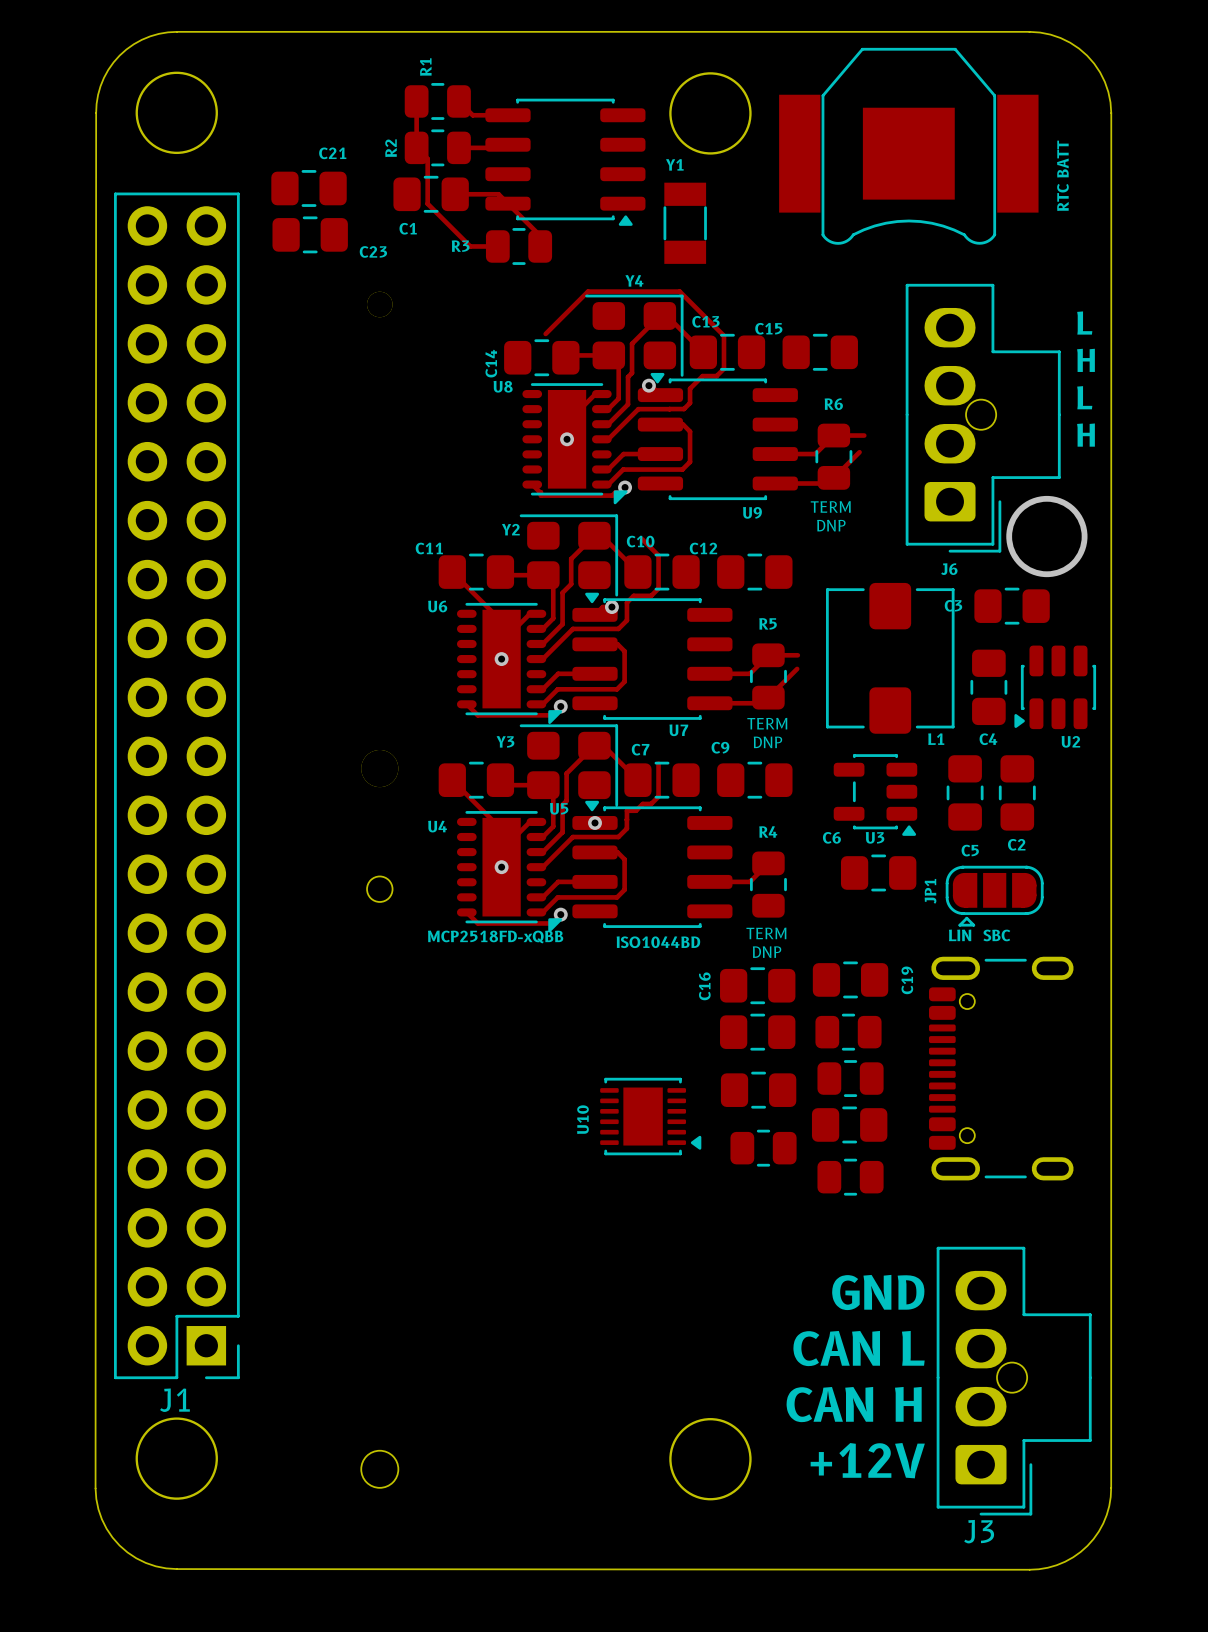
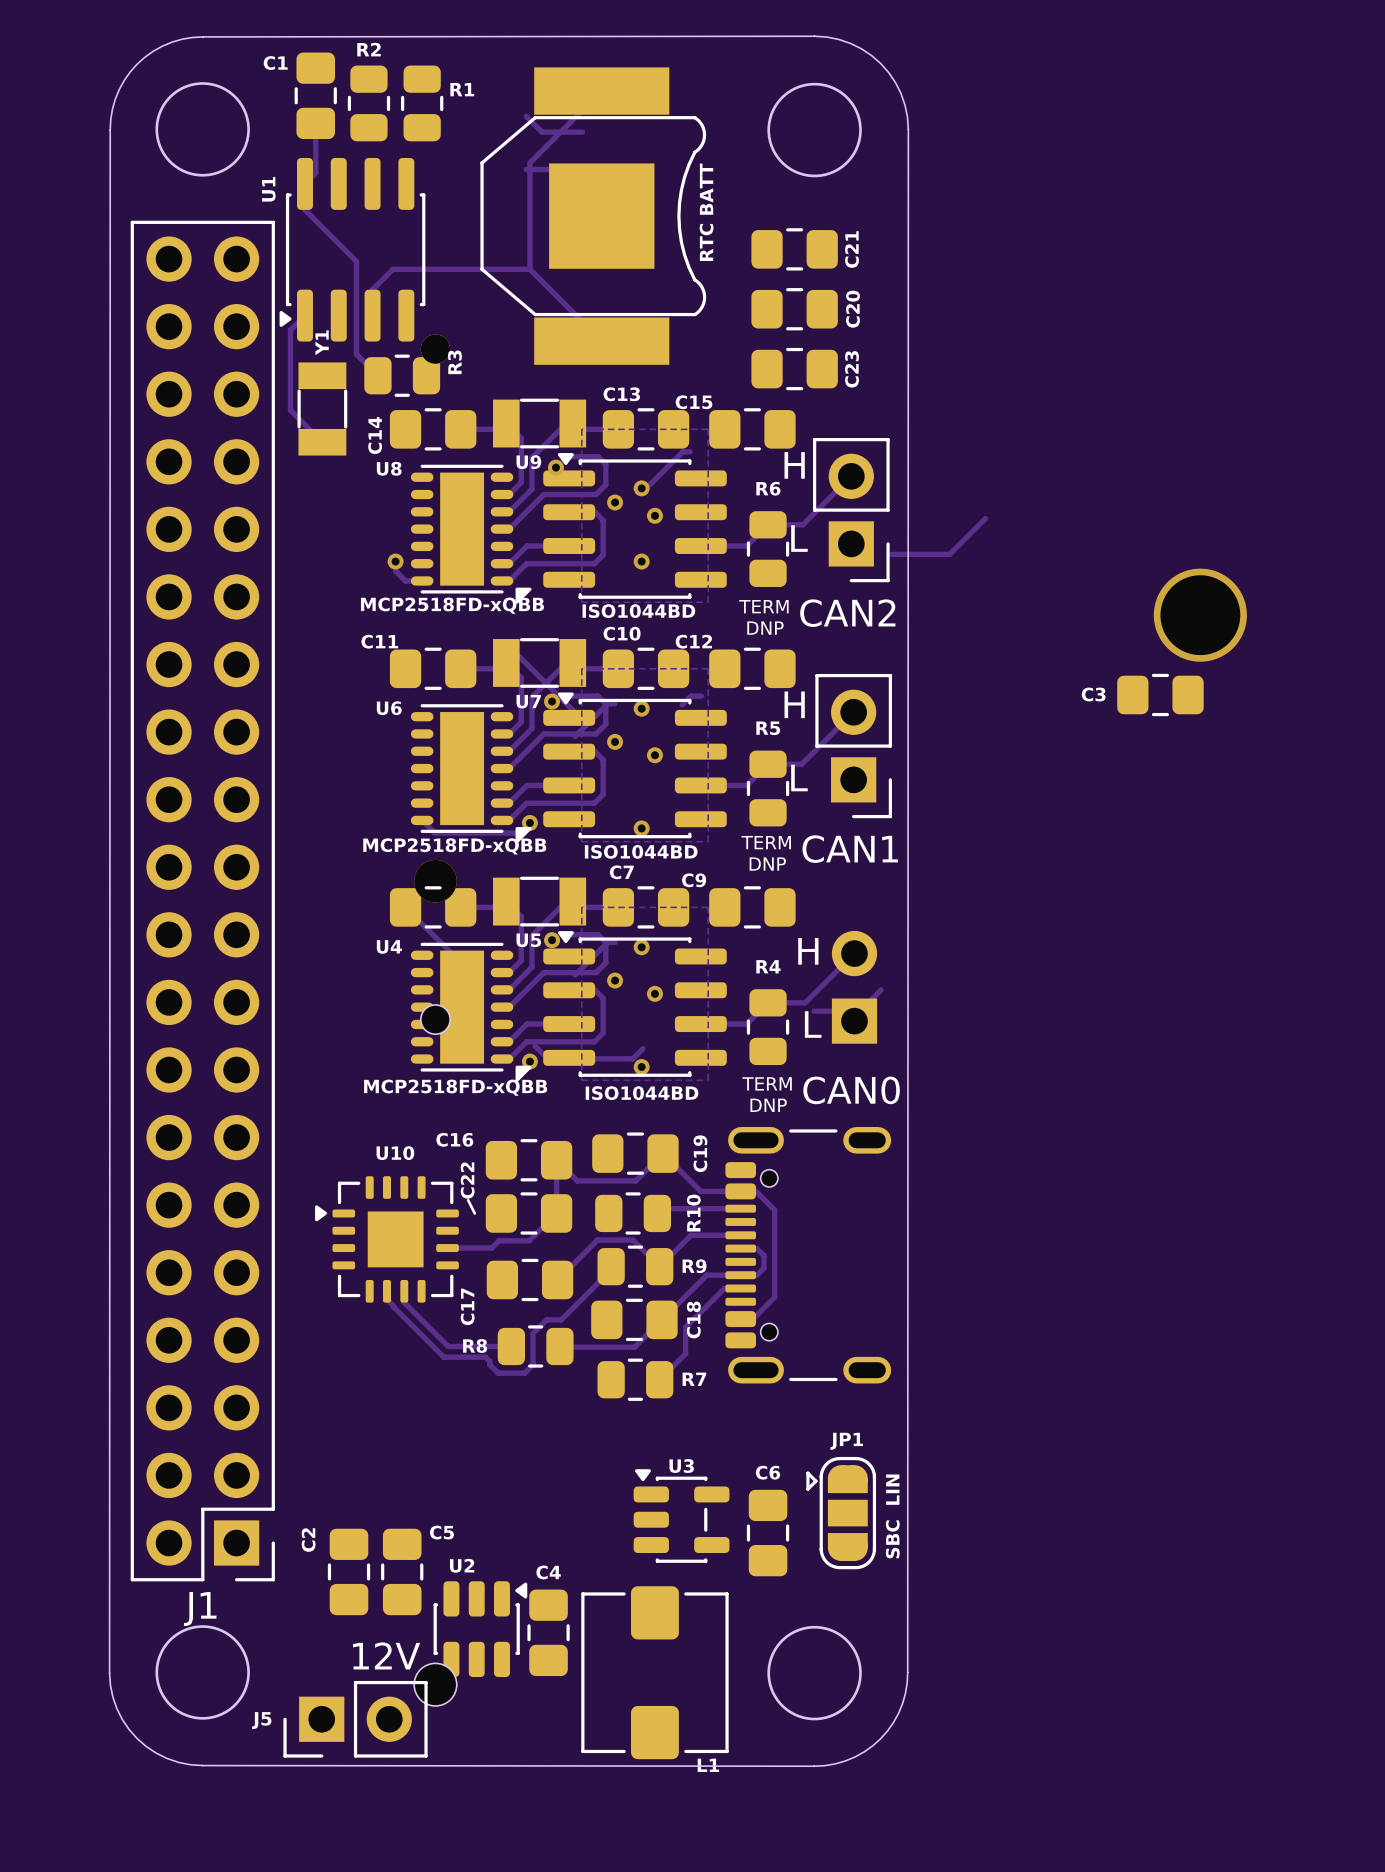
track: none -> (601, 91) (529, 162) (529, 269)
track: (416, 101) (416, 147) (427, 158) (427, 203) (470, 246) (497, 246) -> none
R1 rotation: 0° (437, 101) -> 90° clockwise (422, 103)
R1 position: (437, 101) -> (422, 103)
track: none -> (315, 123) (315, 173) (304, 183) (304, 209) (356, 261) (356, 354) (377, 375)
board edge: (96, 113) (98, 94) (103, 77) (119, 55) (141, 39) (159, 33) (177, 31) (1029, 31) (1060, 38) (1079, 48) (1094, 63) (1108, 92) (1111, 113) (1111, 1487) (1109, 1506) (1103, 1523) (1087, 1545) (1065, 1561) (1038, 1569) (176, 1569) (155, 1566) (136, 1558) (112, 1537) (98, 1509) (95, 1488) (95, 1459) -> (110, 130) (115, 99) (130, 71) (153, 51) (172, 42) (192, 37) (814, 36) (838, 39) (861, 48) (880, 63) (895, 82) (905, 105) (908, 129) (907, 1672) (905, 1693) (898, 1713) (880, 1738) (864, 1751) (845, 1761) (814, 1766) (190, 1764) (167, 1758) (156, 1753) (137, 1738) (122, 1719) (116, 1708) (112, 1697) (109, 1673)
part rotation: 0° (908, 146) -> 90° counterclockwise (593, 216)
part position: (908, 146) -> (593, 216)
R2 rotation: 0° (437, 147) -> 90° clockwise (368, 103)
R2 position: (437, 147) -> (368, 103)
C21 name rotation: 0° (332, 153) -> 90° counterclockwise (852, 249)
C21 name position: C21 (332, 153) -> C21 (852, 249)
part: (565, 162) -> none
Y1 name rotation: 0° (674, 164) -> 90° counterclockwise (322, 342)
text position: RTC BATT (1062, 175) -> RTC BATT (706, 212)
C21 position: (309, 188) -> (794, 249)
C1 rotation: 0° (431, 194) -> 90° clockwise (315, 95)
C1 position: (431, 194) -> (315, 95)
track: (455, 194) (498, 194) (540, 235) (540, 246) -> none
U1: none -> (352, 249)
Y1 position: (685, 223) -> (322, 408)
C23 position: (310, 234) -> (794, 369)
track: none -> (529, 269) (601, 341)
track: none -> (529, 269) (392, 269) (372, 289) (372, 315)
R3 name rotation: 0° (460, 246) -> 90° counterclockwise (454, 362)
R3 name position: R3 (460, 246) -> R3 (454, 362)
R3 position: (519, 246) -> (402, 375)
C23 name rotation: 0° (373, 251) -> 90° counterclockwise (852, 369)
C20: none -> (794, 309)
track: none -> (304, 315) (290, 330) (290, 410) (322, 442)
text: L (1084, 323) -> none
track: (545, 333) (588, 291) (679, 291) (723, 335) (723, 368) (716, 376) (702, 376) (690, 388) (690, 403) (684, 409) (638, 409) (608, 439) (601, 439) -> none
Y4: (634, 335) -> none
track: (703, 352) (667, 315) (659, 315) (632, 343) (632, 373) (628, 377) (628, 404) (608, 424) (601, 424) -> none
C13 position: (727, 352) -> (645, 429)
C15 position: (820, 352) -> (752, 429)
C14 position: (541, 357) -> (433, 429)
track: (565, 357) (568, 355) (608, 355) (618, 365) (618, 398) (608, 409) (601, 409) -> none
text: H (1086, 360) -> none
part: none -> (539, 423)
track: none -> (460, 429) (500, 429) (506, 423) (521, 438) (521, 482) (509, 494) (501, 494)
zone outline: none -> (581, 429) (581, 602) (708, 602) (708, 429) (581, 429)
track: none -> (618, 429) (578, 429) (572, 423) (566, 423) (531, 457) (531, 489) (509, 511) (501, 511)
via: (648, 385) -> none
text: L (1084, 397) -> none
track: none -> (567, 456) (598, 456) (605, 464) (605, 484) (596, 494) (543, 494) (509, 529) (501, 529)
text: none -> H (794, 465)
via: none -> (555, 467)
track: none -> (851, 476) (802, 524) (768, 524) (746, 546) (700, 546)
J6: (983, 418) -> none
track: (660, 424) (683, 424) (690, 431) (690, 461) (682, 469) (623, 469) (608, 484) (601, 484) -> (569, 512) (595, 512) (603, 520) (603, 555) (594, 563) (526, 563) (509, 580) (501, 580)
via: none -> (641, 488)
track: (864, 435) (833, 435) (815, 454) (775, 454) -> none
text: H (1086, 435) -> none
U9 position: (717, 436) -> (635, 525)
via: none -> (615, 502)
via: (567, 439) -> none
U8 position: (574, 443) -> (471, 534)
part: none -> (851, 510)
via: none -> (654, 515)
track: (660, 454) (623, 454) (608, 469) (601, 469) -> (569, 546) (526, 546) (509, 563) (501, 563)
R6 position: (833, 456) -> (768, 549)
text: none -> L (799, 538)
track: (532, 484) (540, 492) (540, 495) (612, 495) (615, 492) (620, 492) (625, 487) -> none
via: (625, 487) -> none
track: none -> (395, 561) (395, 571) (405, 580) (422, 580)
via: none -> (395, 561)
via: none -> (641, 561)
text: TERM (830, 506) -> none
U9 name position: U9 (752, 512) -> U9 (528, 462)
text: DNP (831, 525) -> none
text: none -> MCP2518FD-xQBB (452, 605)
text: none -> TERM (763, 606)
text: none -> ISO1044BD (638, 611)
text: none -> CAN2 (847, 613)
track: (642, 539) (658, 555) (658, 588) (651, 595) (633, 595) (626, 602) (626, 620) (618, 628) (572, 628) (542, 659) (536, 659) -> none
text: none -> DNP (765, 628)
Y2: (568, 555) -> none
C11 position: (476, 572) -> (433, 668)
track: (500, 572) (503, 575) (543, 575) (553, 585) (553, 618) (542, 628) (536, 628) -> none
track: (637, 572) (601, 535) (594, 535) (571, 558) (571, 584) (562, 592) (562, 624) (542, 643) (536, 643) -> none
C10 position: (662, 572) -> (645, 668)
C12 position: (754, 572) -> (752, 668)
part: none -> (539, 662)
track: none -> (460, 668) (500, 668) (506, 662) (521, 677) (521, 721) (509, 733) (501, 733)
zone outline: none -> (581, 668) (581, 841) (708, 841) (708, 668) (581, 668)
track: none -> (618, 668) (578, 668) (572, 662) (566, 662) (531, 697) (531, 728) (509, 751) (501, 751)
track: none -> (567, 696) (598, 696) (605, 703) (605, 724) (596, 733) (543, 733) (509, 768) (501, 768)
via: (611, 607) -> none
via: none -> (552, 701)
text: none -> H (794, 704)
via: none -> (641, 708)
track: none -> (853, 712) (801, 764) (768, 764) (746, 785) (700, 785)
track: (595, 644) (617, 644) (624, 651) (624, 681) (617, 689) (557, 689) (542, 704) (536, 704) -> (569, 751) (595, 751) (603, 759) (603, 794) (594, 803) (526, 803) (509, 820) (501, 820)
via: none -> (615, 741)
part: none -> (853, 746)
track: (797, 655) (768, 655) (749, 673) (709, 673) -> none
U7 position: (652, 656) -> (635, 765)
via: none -> (654, 755)
L1 position: (890, 658) -> (654, 1672)
via: (501, 659) -> none
U6 position: (509, 663) -> (471, 773)
track: (797, 668) (762, 703) (709, 703) -> none
track: (595, 673) (558, 673) (542, 689) (536, 689) -> (569, 785) (526, 785) (509, 803) (501, 803)
R5 position: (768, 676) -> (768, 788)
text: none -> L (799, 777)
C4 position: (988, 687) -> (548, 1632)
U2 rotation: 0° (1055, 687) -> 180° (480, 1629)
U2 position: (1055, 687) -> (480, 1629)
track: (466, 704) (477, 715) (551, 715) (560, 706) -> (422, 820) (434, 833) (519, 833) (529, 822)
via position: (560, 706) -> (641, 828)
via: none -> (529, 822)
text position: TERM (767, 723) -> TERM (766, 842)
U7 name position: U7 (678, 730) -> U7 (528, 701)
text: none -> MCP2518FD-xQBB (454, 846)
C4 name position: C4 (988, 739) -> C4 (548, 1572)
text: none -> CAN1 (850, 849)
text position: DNP (767, 742) -> DNP (767, 864)
text: none -> ISO1044BD (641, 851)
C9 name position: C9 (720, 747) -> C9 (694, 880)
part footprint: [438, 761, 515, 799] -> [493, 876, 587, 927]
track: (658, 763) (658, 796) (651, 803) (642, 803) (636, 810) (626, 810) (626, 828) (618, 837) (572, 837) (542, 867) (536, 867) -> none
Y3: (568, 765) -> none
track: (452, 780) (501, 829) -> (405, 907) (462, 963)
track: (500, 780) (505, 785) (543, 785) (553, 795) (553, 826) (542, 837) (536, 837) -> none
track: (637, 780) (603, 745) (594, 745) (566, 773) (566, 800) (562, 804) (562, 832) (542, 852) (536, 852) -> none
C7 position: (662, 780) -> (645, 907)
C9 position: (754, 780) -> (752, 907)
part: none -> (433, 907)
track: none -> (460, 907) (500, 907) (506, 901) (521, 916) (521, 960) (509, 972) (501, 972)
zone outline: none -> (581, 907) (581, 1080) (708, 1080) (708, 907) (581, 907)
track: none -> (618, 907) (578, 907) (572, 901) (566, 901) (531, 935) (531, 967) (509, 989) (501, 989)
C5 position: (965, 792) -> (402, 1571)
C2 position: (1017, 792) -> (349, 1571)
U3 rotation: 0° (875, 795) -> 180° (681, 1516)
U3 position: (875, 795) -> (681, 1516)
track: none -> (567, 934) (598, 934) (605, 942) (605, 962) (596, 972) (543, 972) (509, 1007) (501, 1007)
via: none -> (552, 940)
via: (595, 822) -> none
U4 name position: U4 (437, 826) -> U4 (389, 946)
via: none -> (641, 947)
track: none -> (854, 953) (805, 1002) (768, 1002) (746, 1024) (700, 1024)
C2 name rotation: 0° (1016, 844) -> 90° counterclockwise (308, 1540)
C2 name position: C2 (1016, 844) -> C2 (308, 1540)
C5 name position: C5 (970, 850) -> C5 (441, 1532)
track: (595, 852) (617, 852) (624, 859) (624, 889) (617, 897) (557, 897) (542, 912) (536, 912) -> (569, 990) (595, 990) (603, 998) (603, 1033) (594, 1041) (526, 1041) (509, 1059) (501, 1059)
via: none -> (615, 980)
part: none -> (854, 987)
U5 position: (652, 864) -> (635, 1003)
via: none -> (654, 993)
via: (501, 867) -> none
U4 position: (509, 871) -> (471, 1012)
C6 rotation: 0° (878, 872) -> 90° clockwise (768, 1533)
C6 position: (878, 872) -> (768, 1533)
track: (595, 881) (558, 881) (542, 897) (536, 897) -> (569, 1024) (526, 1024) (509, 1041) (501, 1041)
R4 position: (768, 884) -> (768, 1027)
JP1 rotation: 0° (994, 896) -> 90° clockwise (841, 1513)
JP1 position: (994, 896) -> (841, 1513)
via position: (560, 914) -> (641, 1067)
via: none -> (529, 1061)
text position: TERM (766, 933) -> TERM (767, 1083)
text: LIN SBC (979, 935) -> none
text: none -> CAN0 (851, 1090)
text position: DNP (767, 952) -> DNP (768, 1105)
C19 position: (850, 979) -> (635, 1153)
C16 position: (757, 985) -> (529, 1160)
C16 name rotation: 0° (704, 986) -> 90° clockwise (454, 1139)
part: (757, 1032) -> none
part: (848, 1032) -> none
line: none -> (468, 1200) (474, 1213)
track: none -> (740, 1208) (662, 1208) (657, 1213)
C22: none -> (529, 1213)
R10: none -> (633, 1213)
part position: (1001, 1068) -> (808, 1255)
U10 footprint: [600, 1077, 702, 1156] -> [315, 1176, 459, 1303]
track: none -> (740, 1235) (691, 1235) (659, 1266) (633, 1240) (597, 1240) (557, 1279)
part: (850, 1078) -> none
track: none -> (447, 1248) (491, 1248) (499, 1240) (529, 1240) (556, 1213) (556, 1160) (577, 1180) (635, 1180) (663, 1153) (700, 1191) (756, 1191) (774, 1210) (774, 1297) (752, 1319) (740, 1319)
track: none -> (740, 1248) (756, 1248) (764, 1255) (764, 1268) (756, 1275) (706, 1275) (634, 1347) (559, 1346)
part: (758, 1090) -> none
track: none -> (611, 1266) (611, 1270) (561, 1319) (546, 1319) (533, 1333) (533, 1364) (524, 1373) (498, 1373) (485, 1357) (443, 1357) (393, 1307) (387, 1299) (387, 1296)
R9: none -> (635, 1266)
C17: none -> (530, 1279)
U10 name position: U10 (582, 1119) -> U10 (395, 1153)
track: none -> (740, 1288) (724, 1288) (685, 1327) (685, 1353) (659, 1379)
part: (849, 1124) -> none
track: none -> (404, 1291) (404, 1302) (448, 1346) (511, 1346)
part: (763, 1148) -> none
C18: none -> (634, 1319)
R8: none -> (535, 1346)
part: (850, 1177) -> none
R7: none -> (635, 1379)
text: GND (878, 1292) -> none
text: none -> SBC LIN (892, 1516)
text: CAN L (859, 1348) -> none
J3: (1014, 1381) -> none
text: CAN H (854, 1404) -> none
text: none -> 12V (386, 1655)
text: +12V (867, 1460) -> none
J5: none -> (355, 1719)

